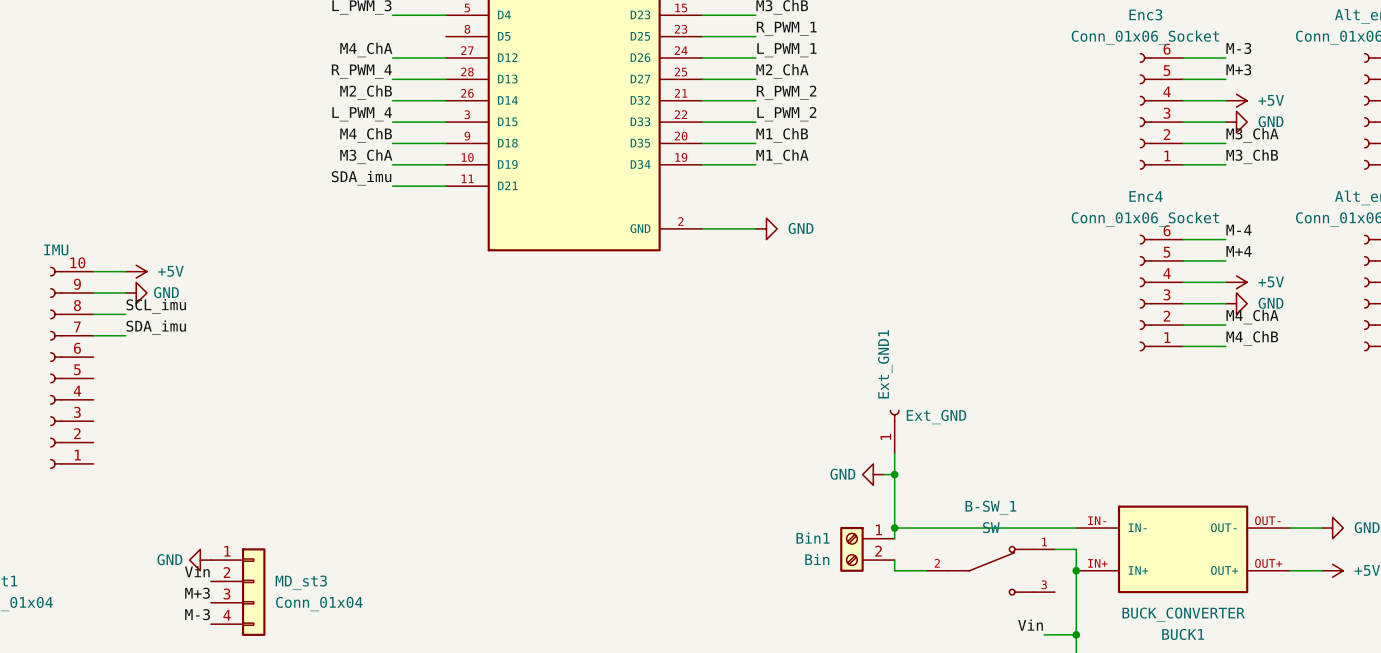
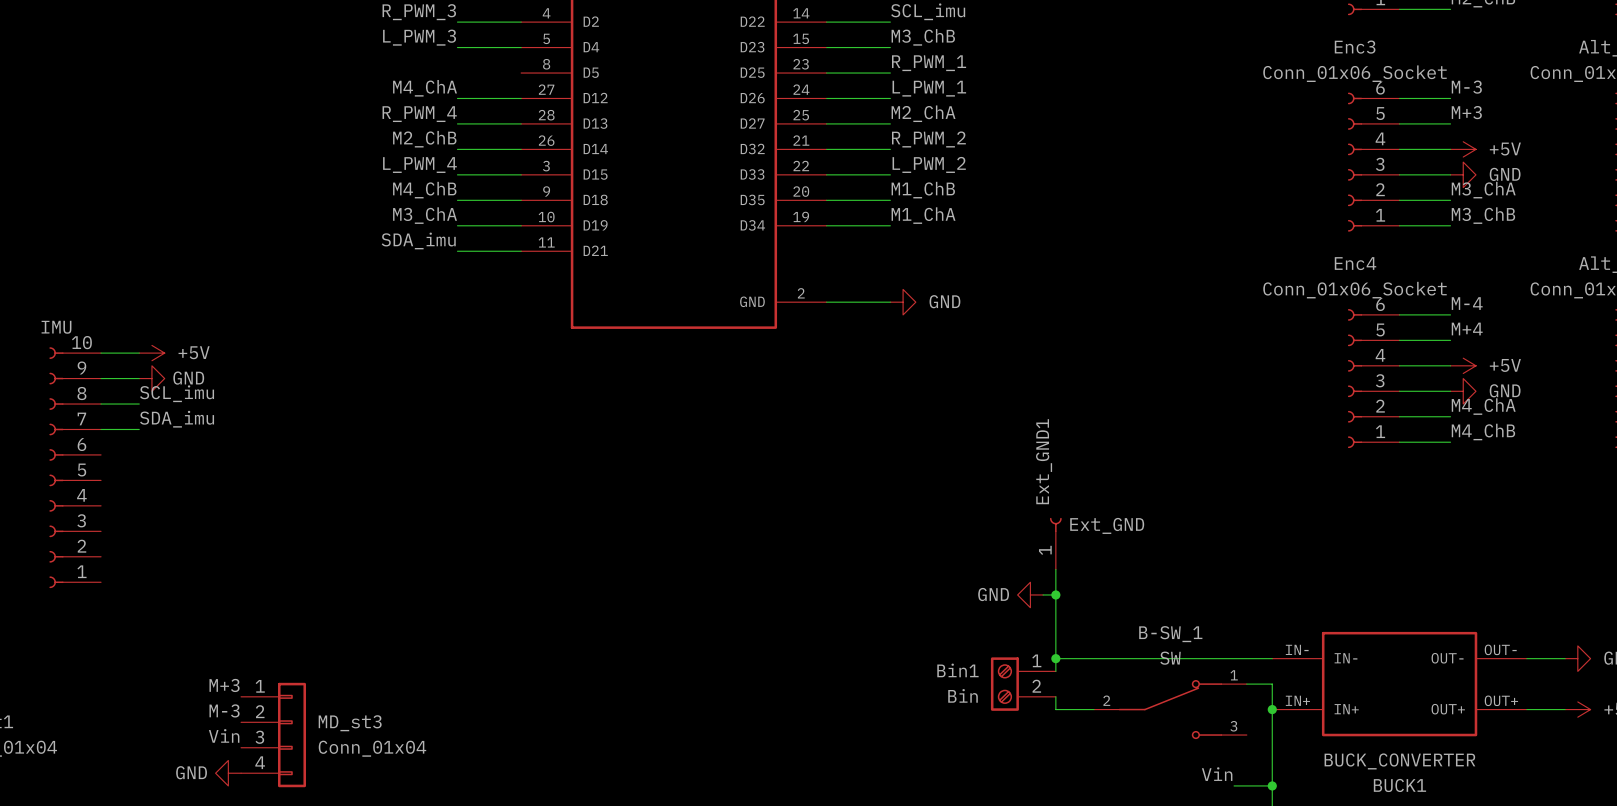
label: none -> M+3 (224, 685)
power symbol position: GND (200, 560) -> GND (228, 773)
label: Vin (197, 571) -> M-3 (224, 710)
label: M+3 (197, 593) -> Vin (224, 735)
label: M-3 (197, 614) -> none

